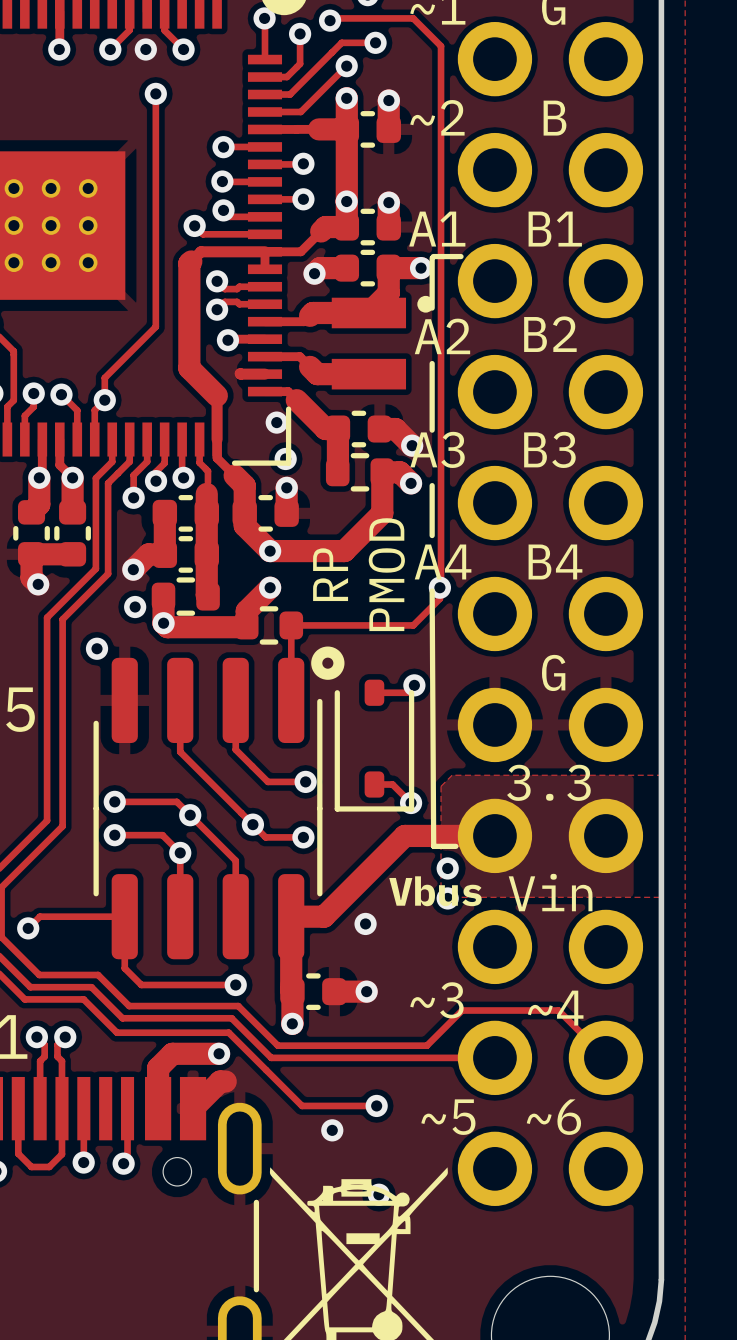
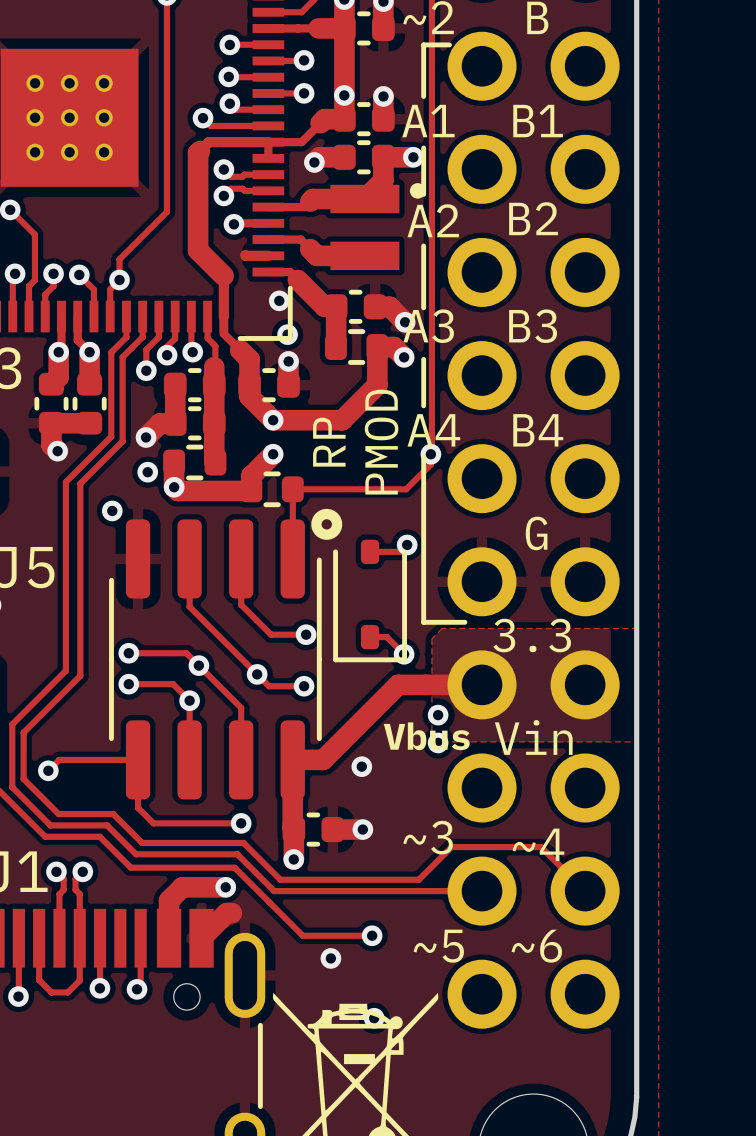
line: none -> (449, 44) (423, 44) (423, 96)
line: (433, 256) (461, 256) -> none
line: (432, 591) (433, 846) (455, 846) -> (423, 457) (423, 622) (464, 622)

